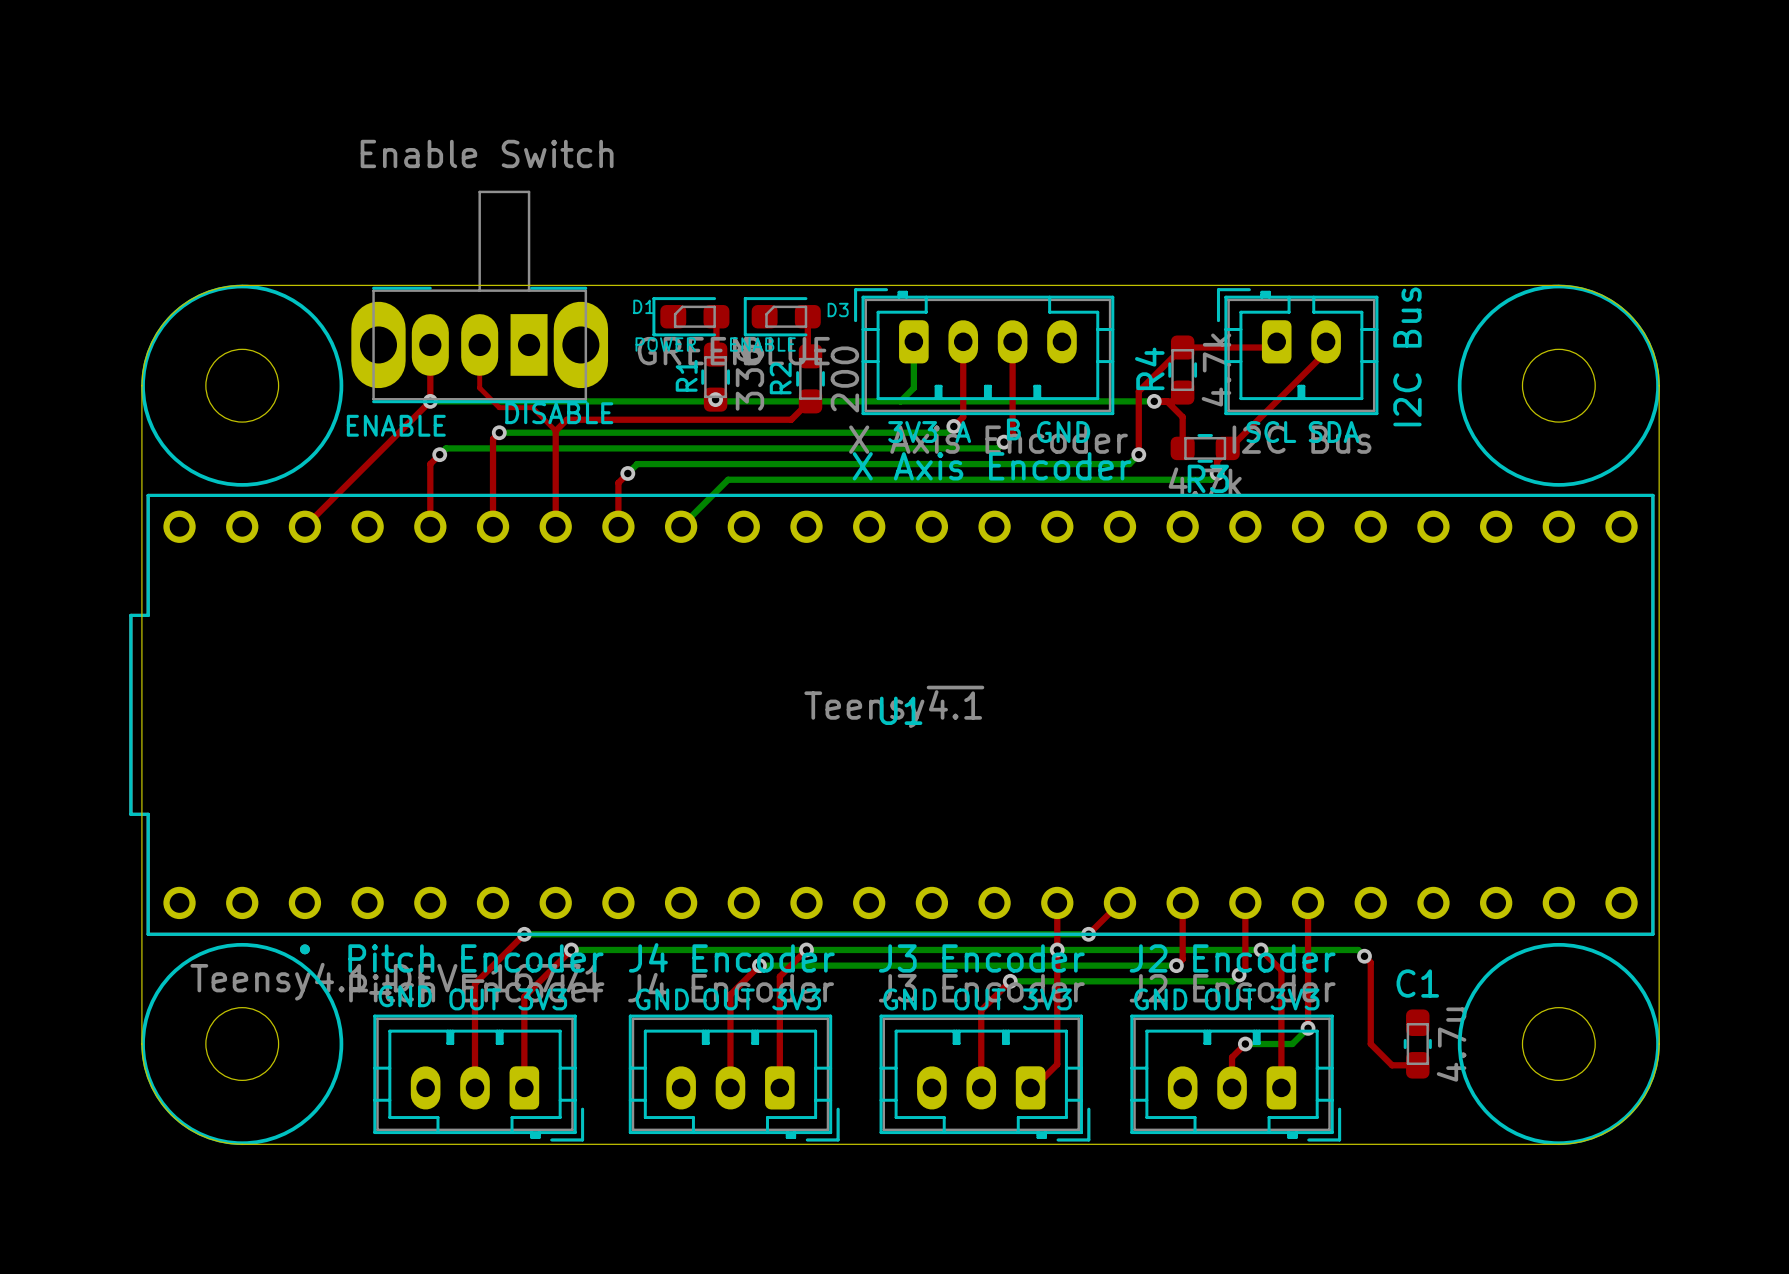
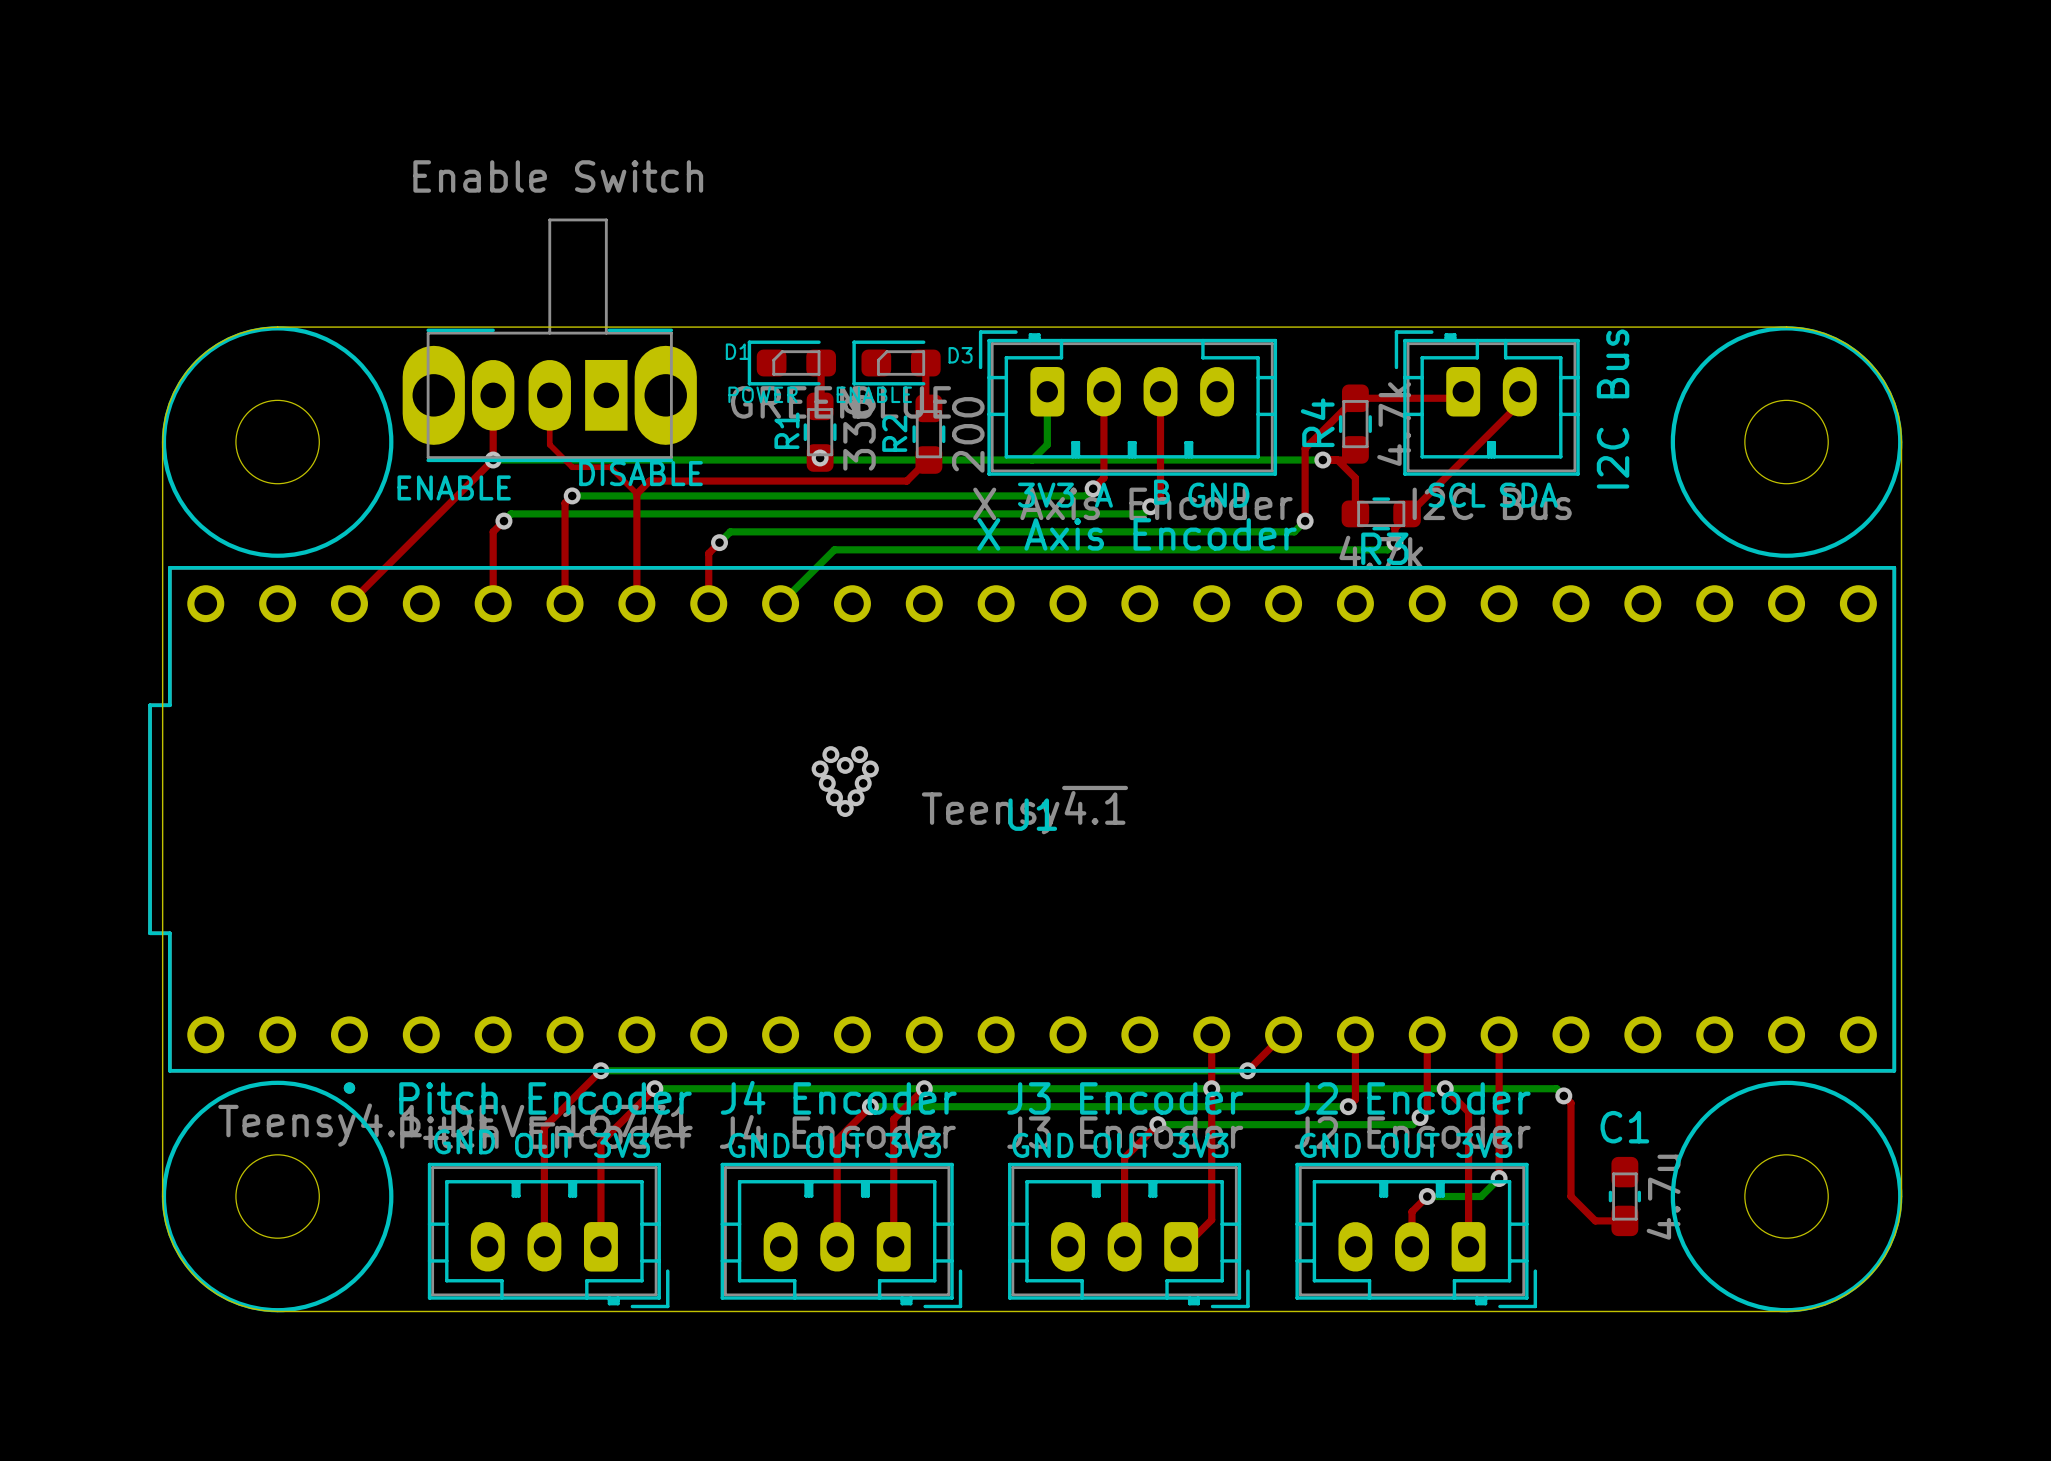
via: none -> (830, 754)
via: none -> (859, 754)
via: none -> (845, 765)
via: none -> (820, 768)
via: none -> (870, 768)
via: none -> (827, 783)
via: none -> (863, 783)
via: none -> (834, 797)
via: none -> (856, 797)
via: none -> (845, 808)

